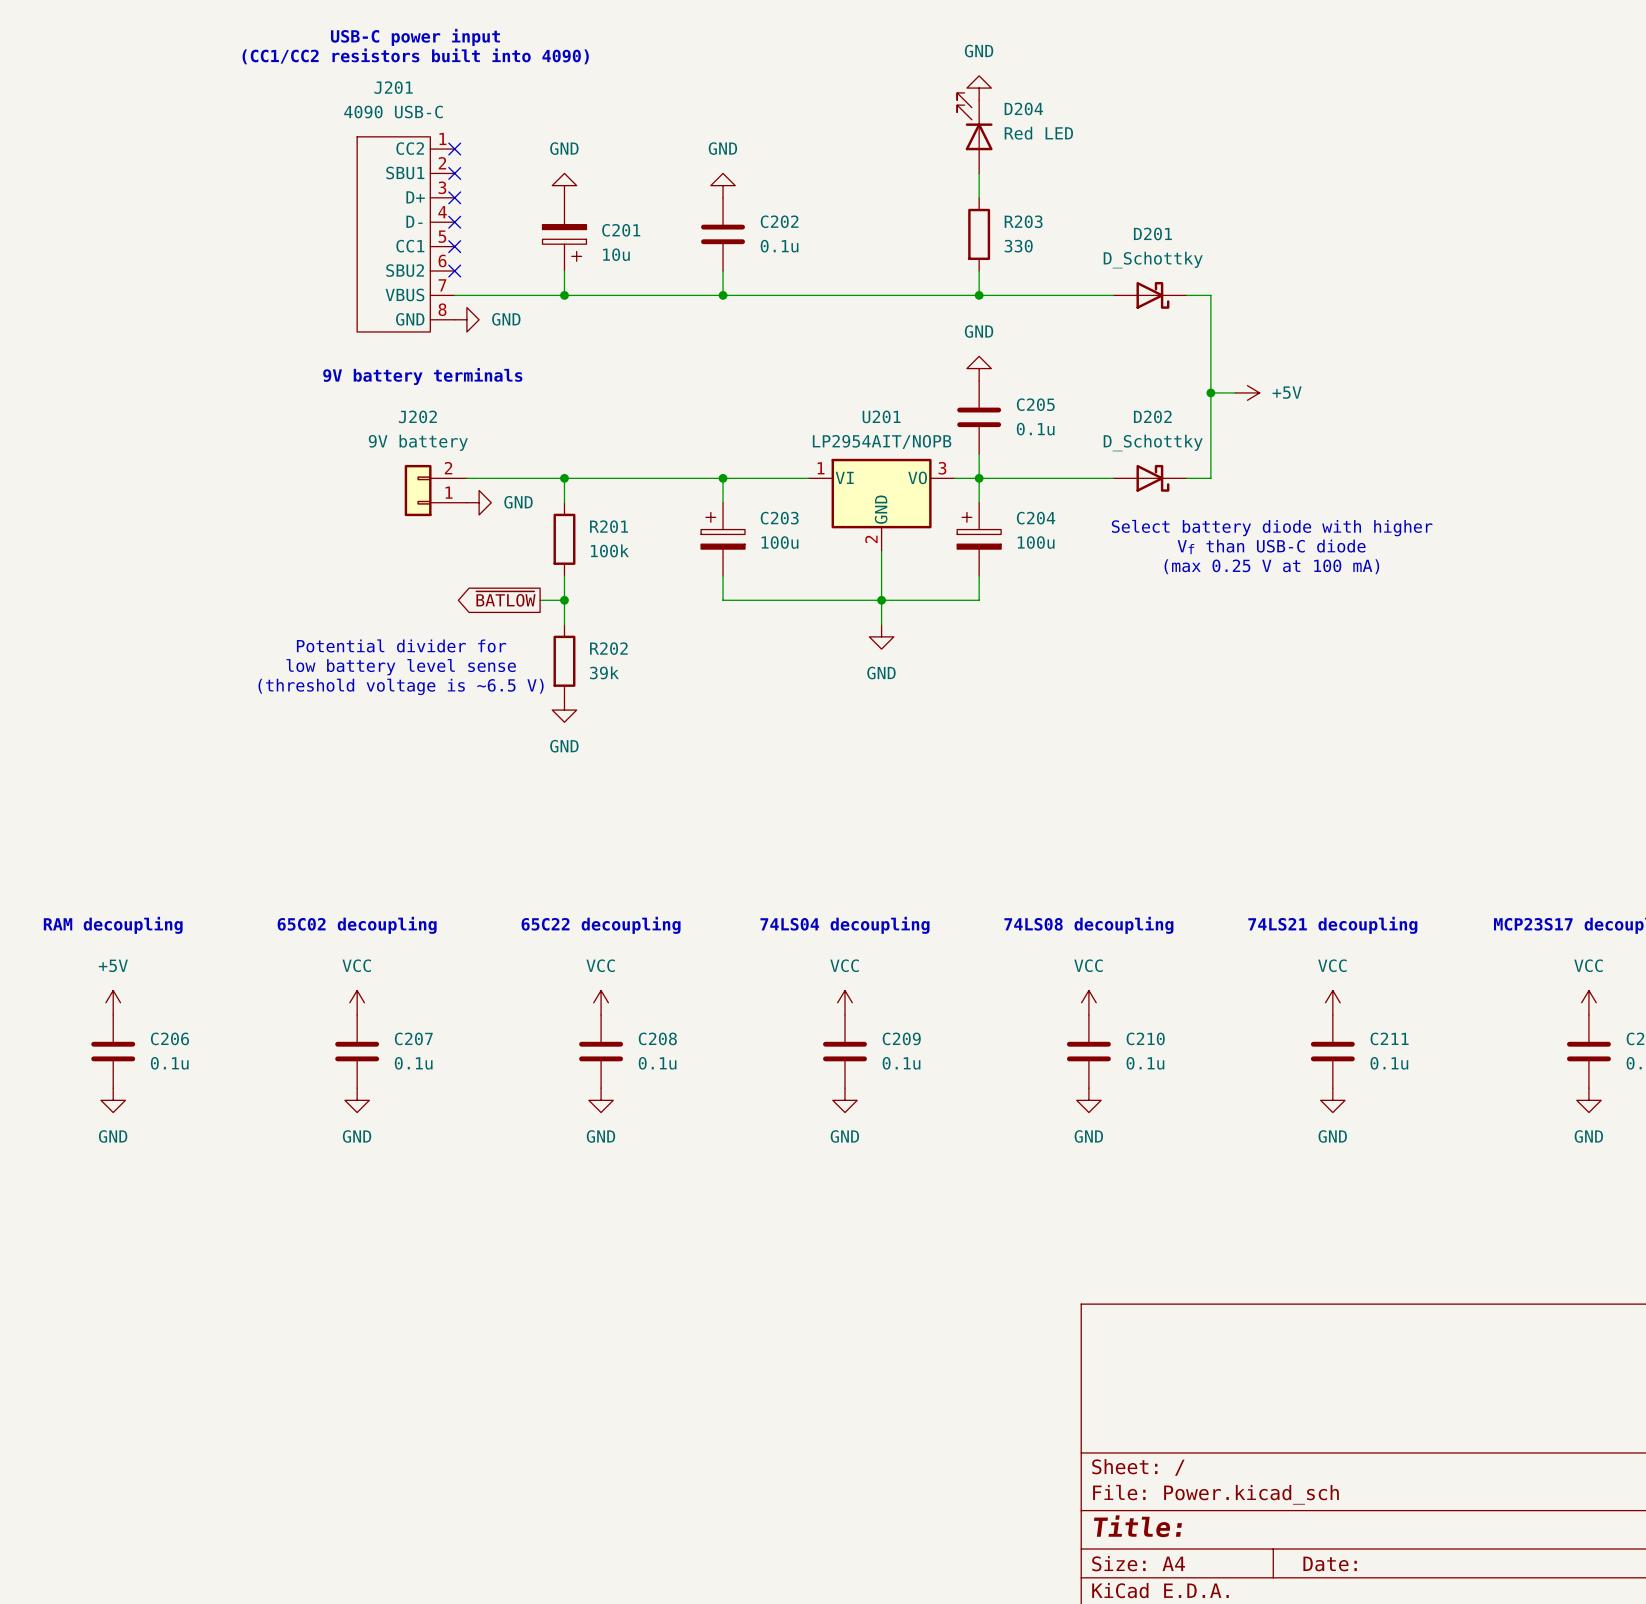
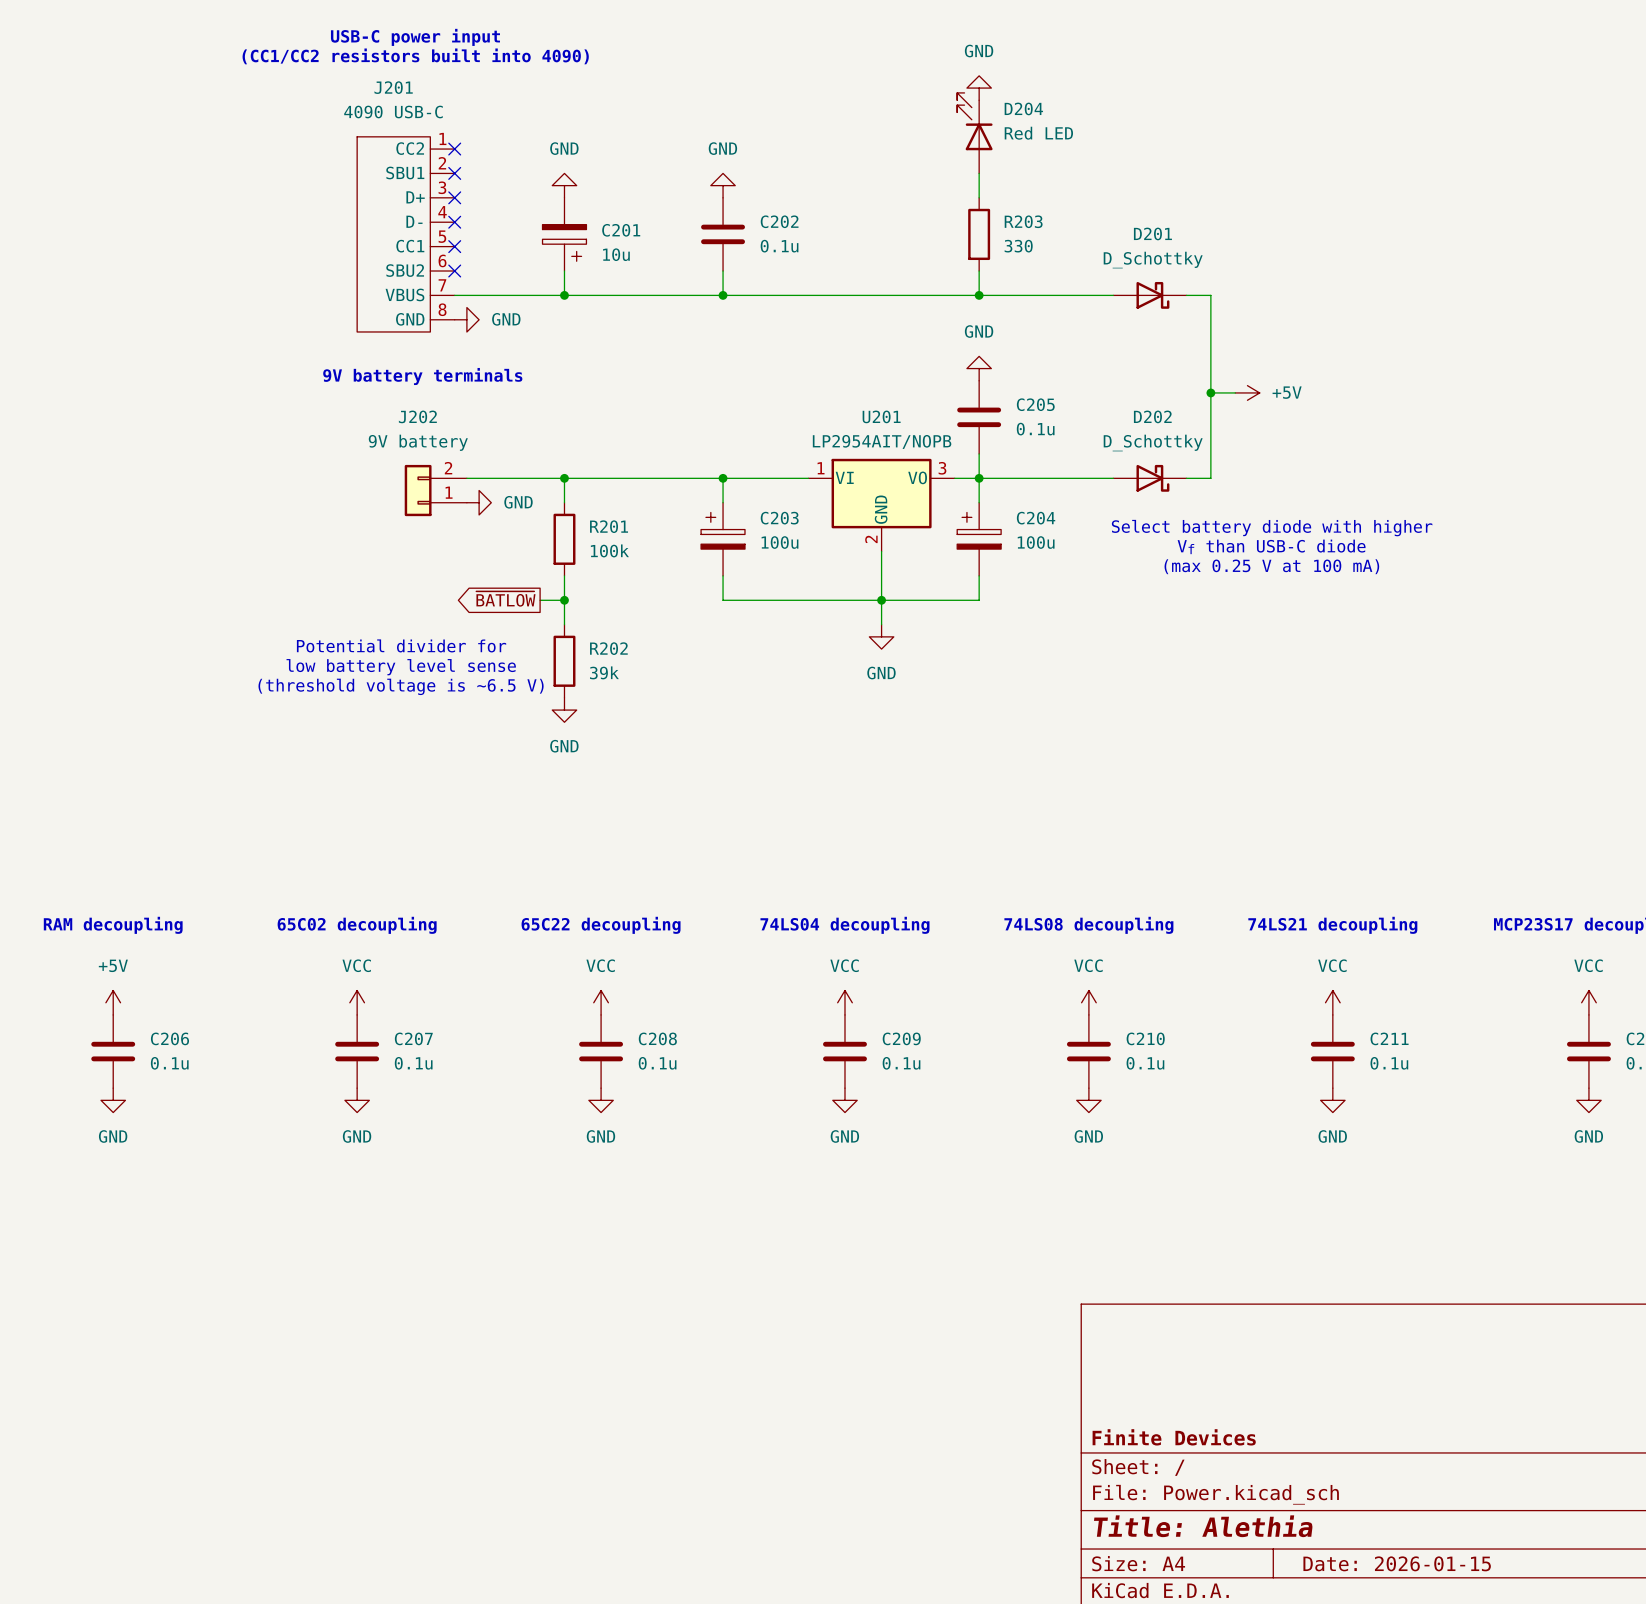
title block: none -> Finite Devices (1174, 1437)
title block: Title: (1137, 1526) -> Title: Alethia (1203, 1526)
title block: Date: (1330, 1563) -> Date: 2026-01-15 (1397, 1563)

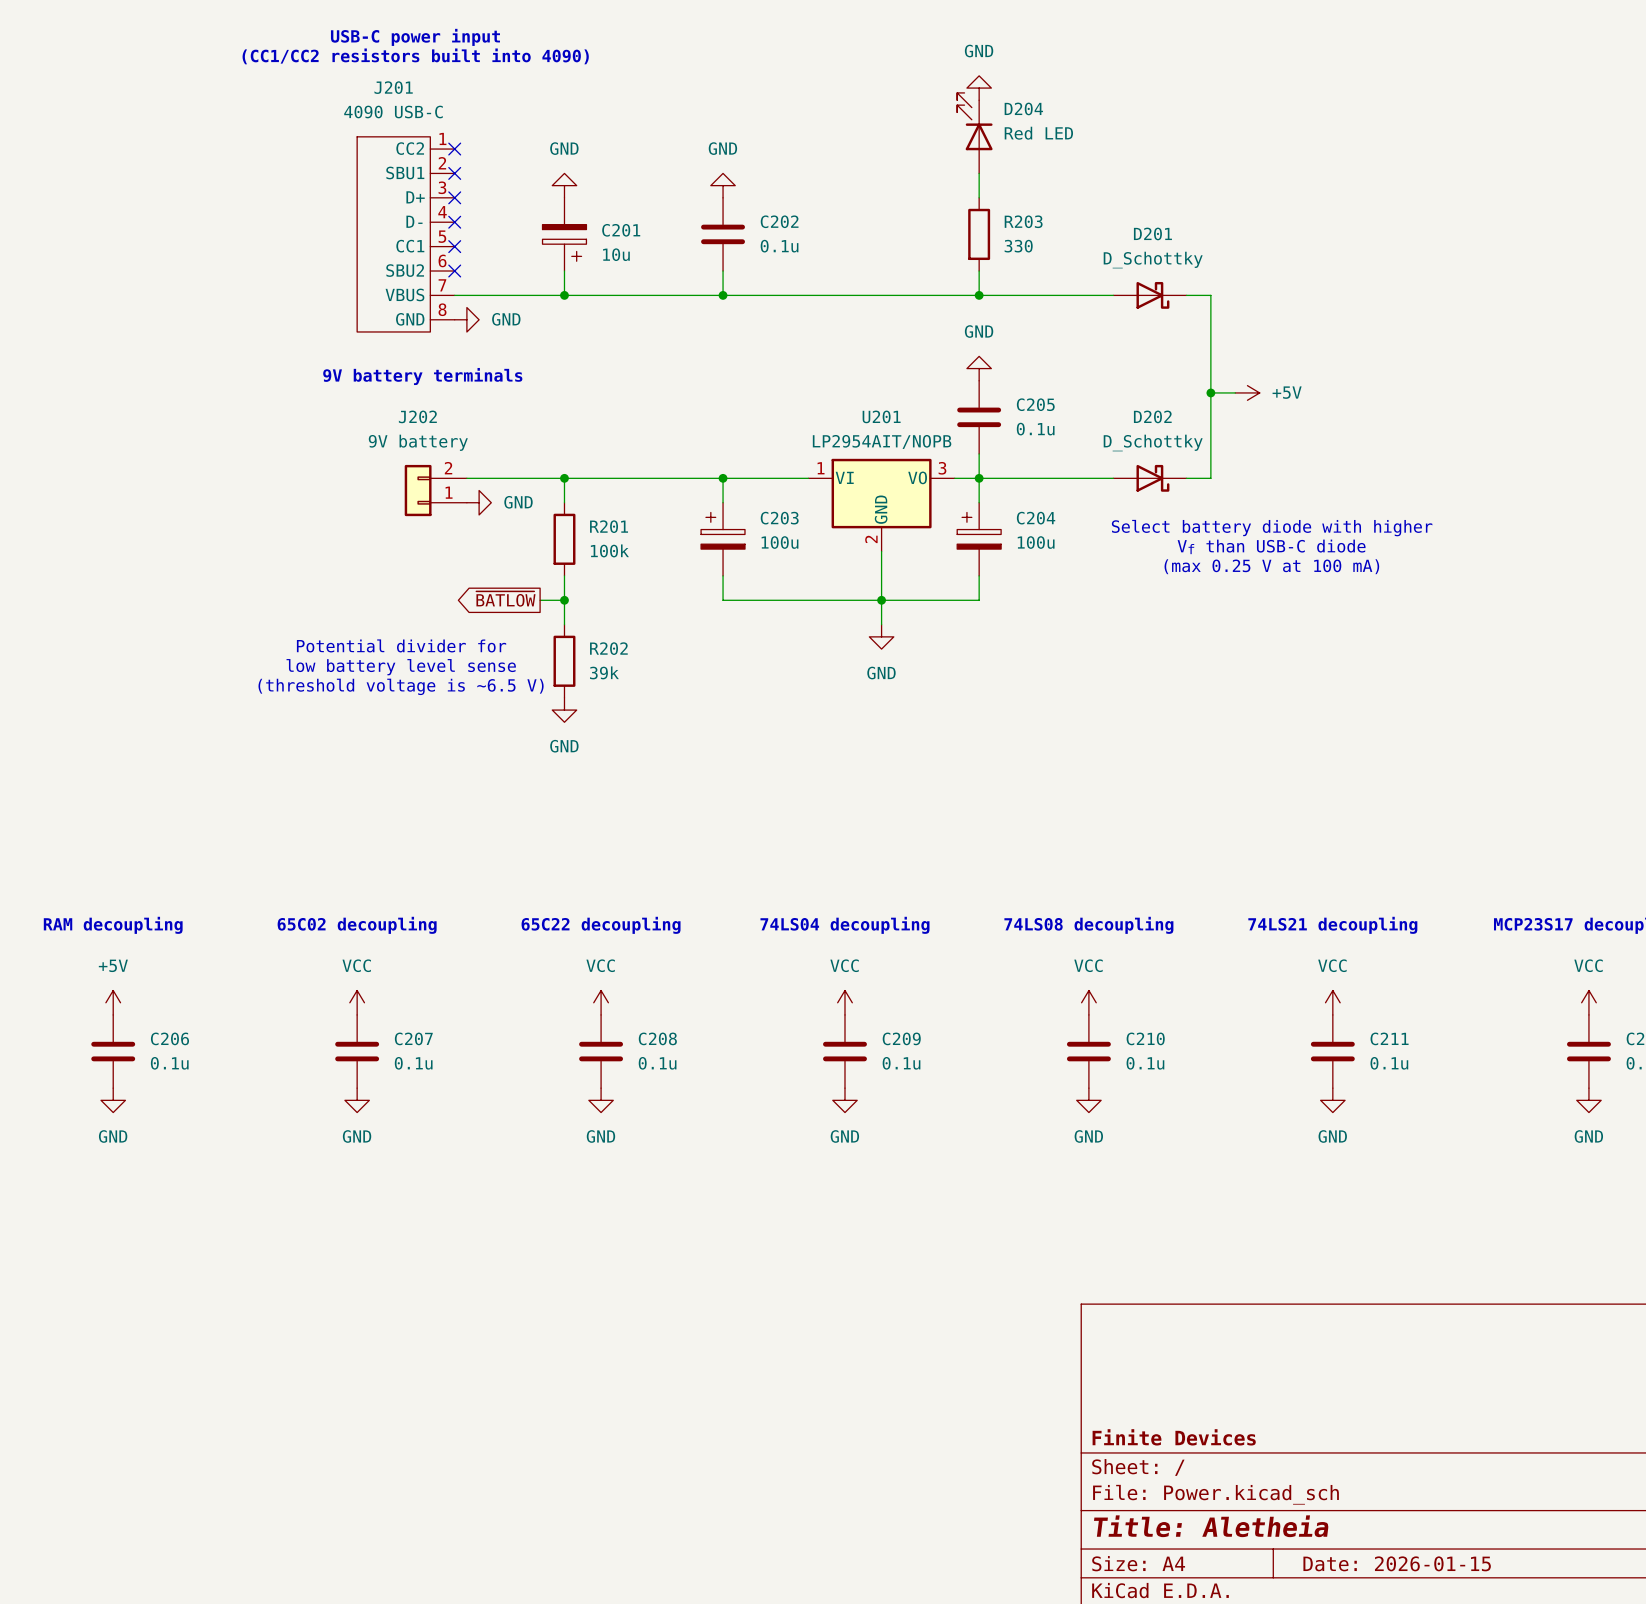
title block: Title: Alethia (1203, 1526) -> Title: Aletheia (1211, 1526)

